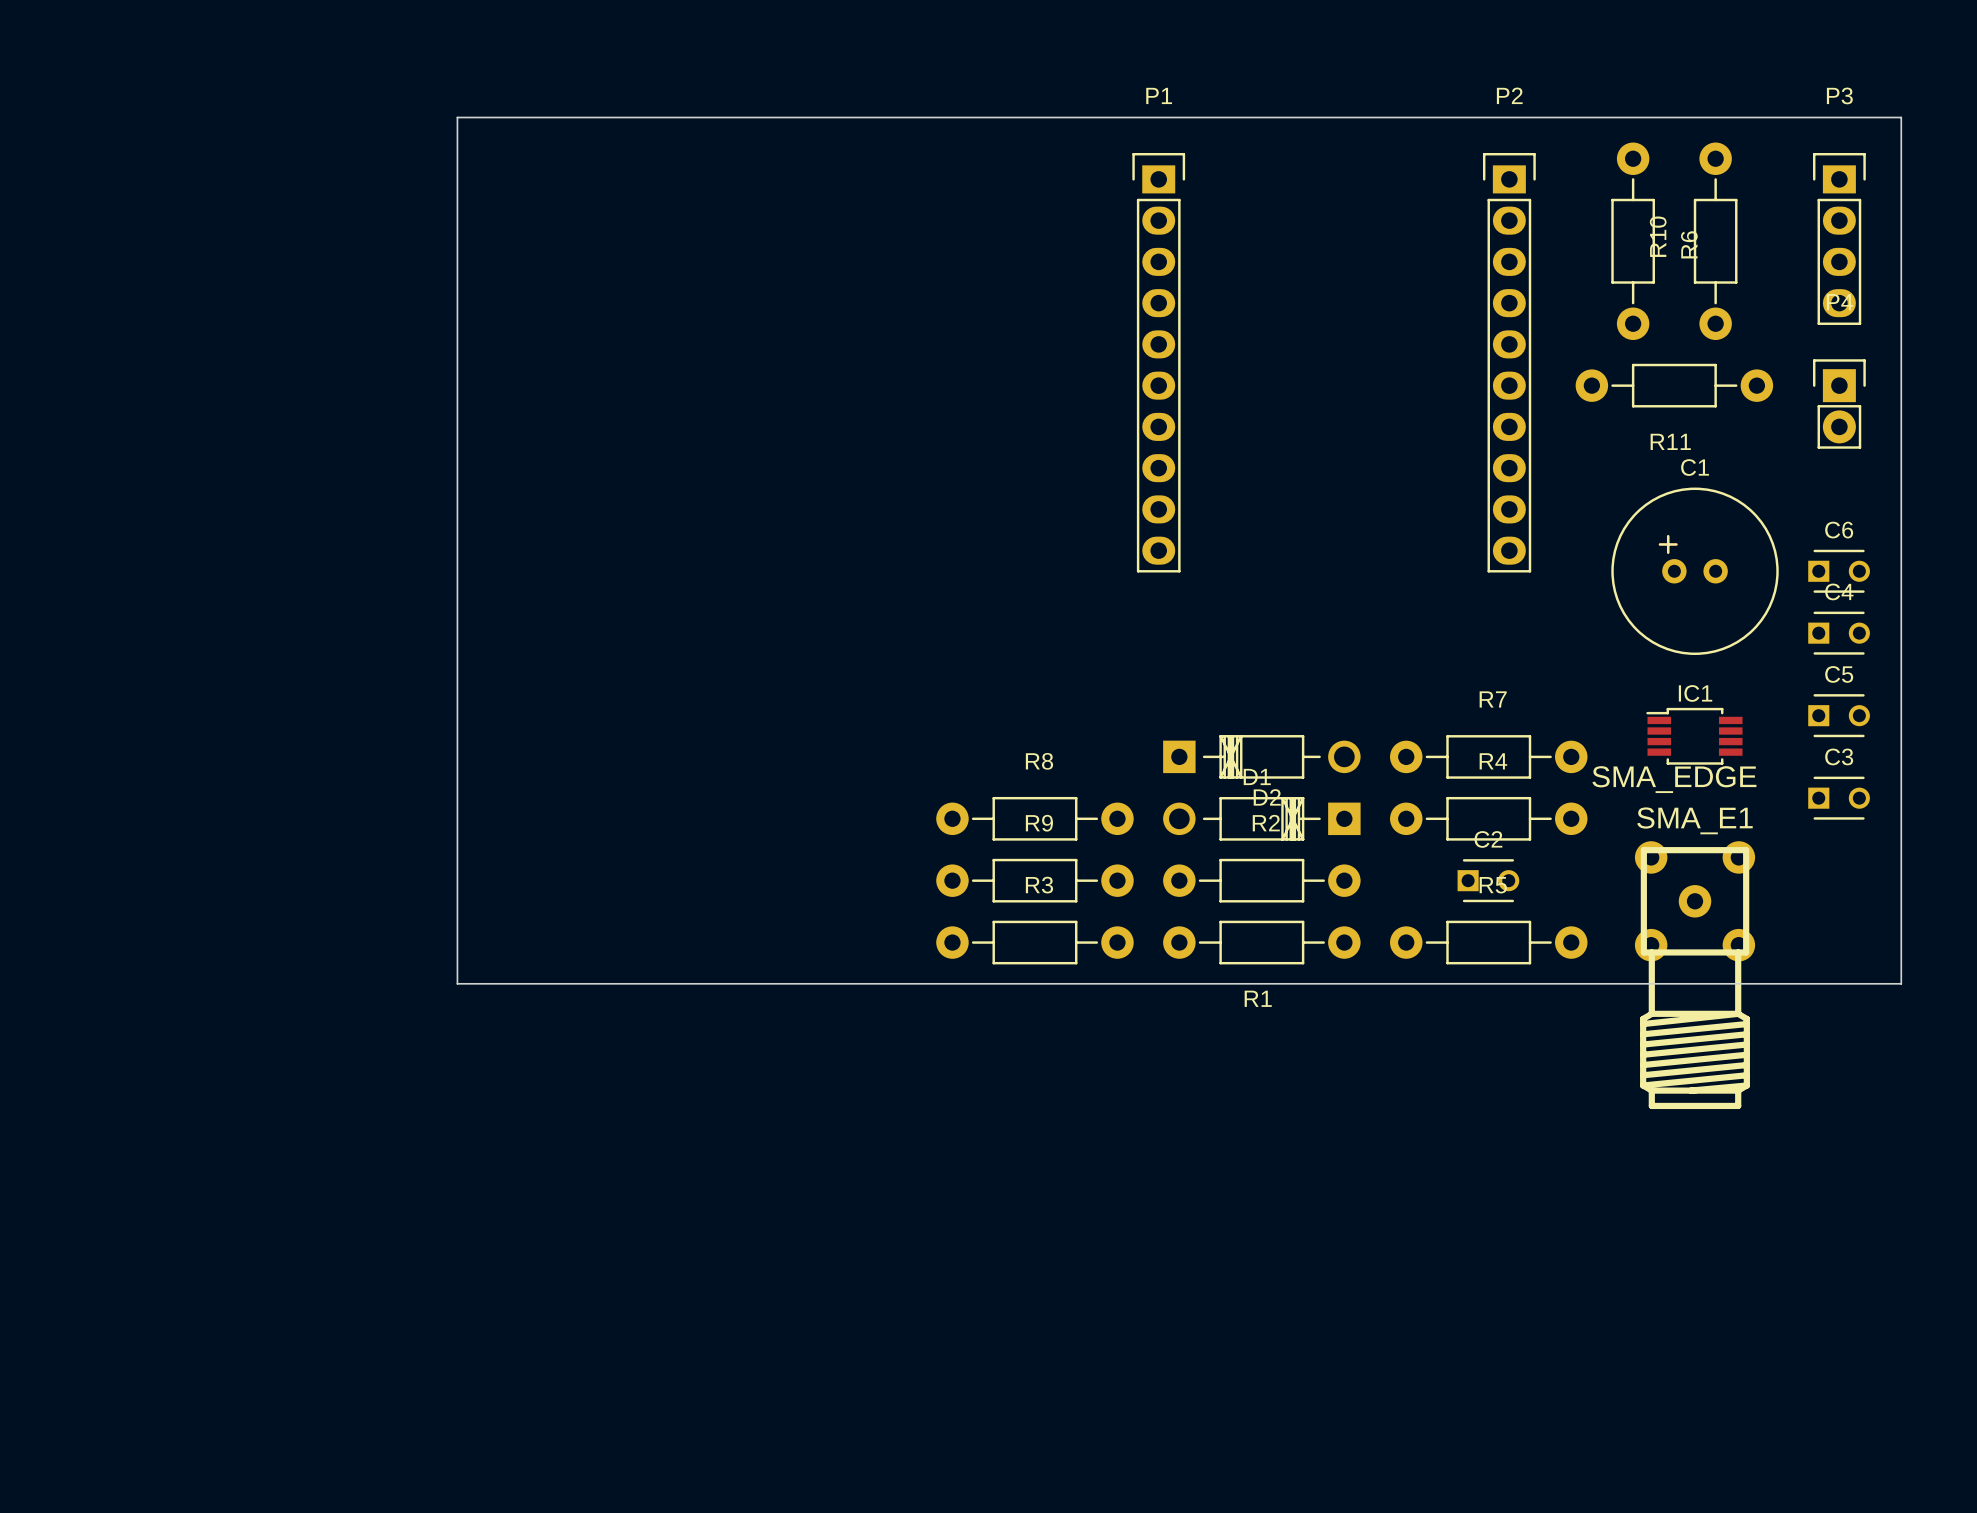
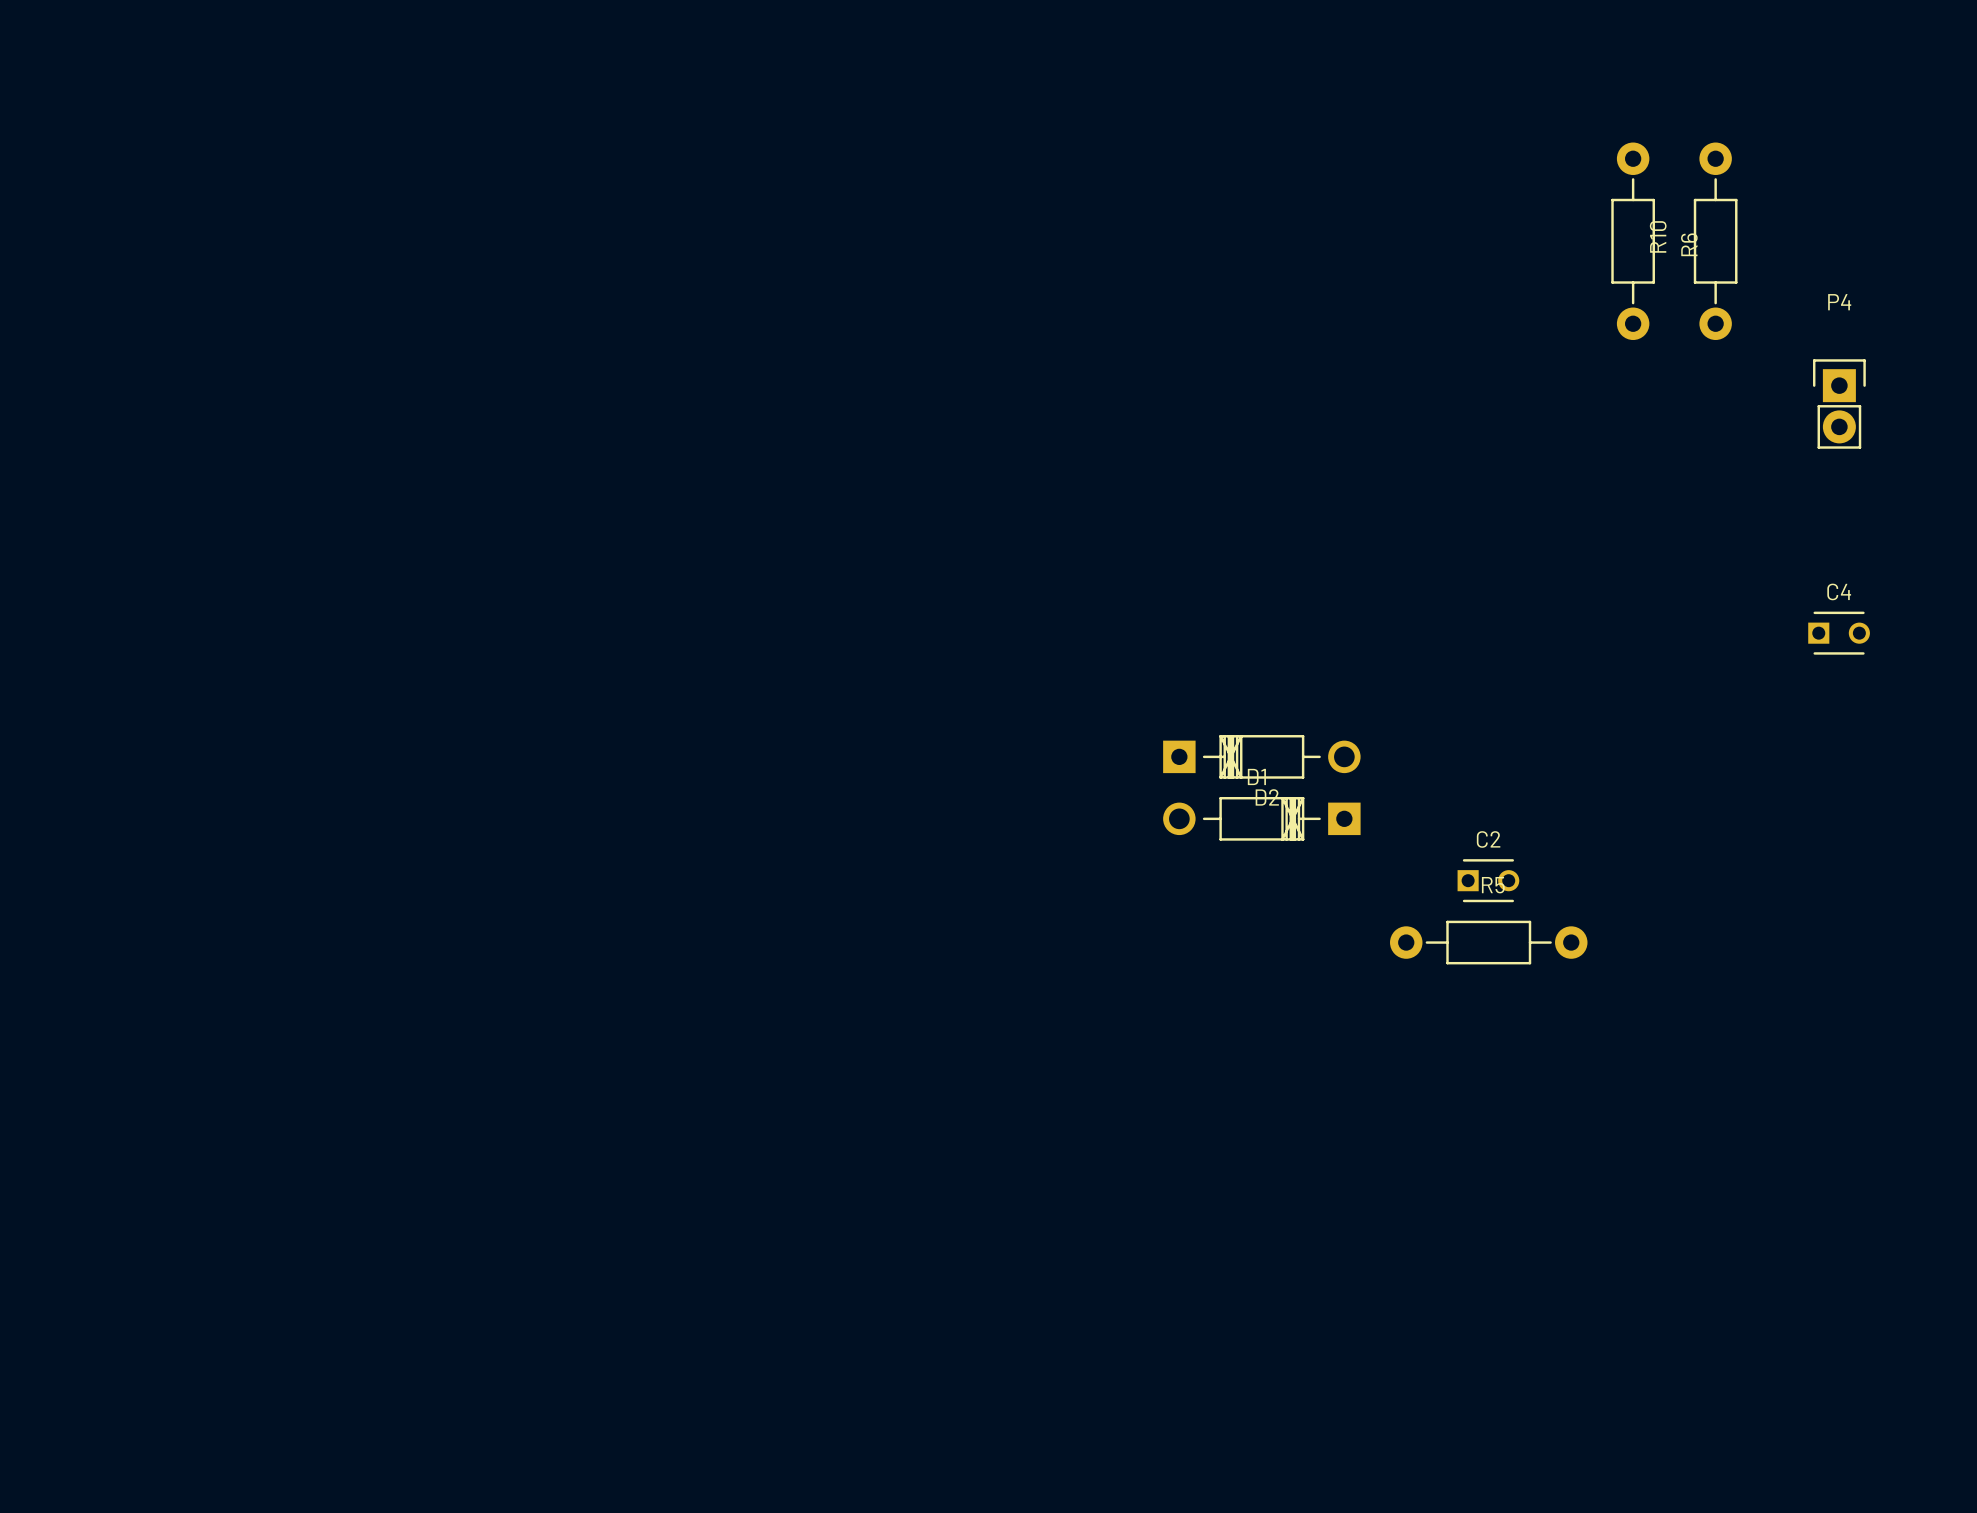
board edge: (457, 117) (457, 983) (1901, 983) (1901, 117) (457, 117) -> none
P3: (1839, 238) -> none
P1: (1158, 362) -> none
P2: (1509, 362) -> none
R11: (1674, 385) -> none
C1: (1695, 571) -> none
C6: (1839, 571) -> none
C5: (1839, 715) -> none
IC1: (1694, 736) -> none
R7: (1488, 756) -> none
C3: (1839, 798) -> none
R8: (1034, 818) -> none
R4: (1488, 818) -> none
R9: (1034, 880) -> none
R2: (1261, 880) -> none
R3: (1034, 942) -> none
R1: (1261, 942) -> none
SMA_E1: SMA_EDGE (1695, 975) -> none

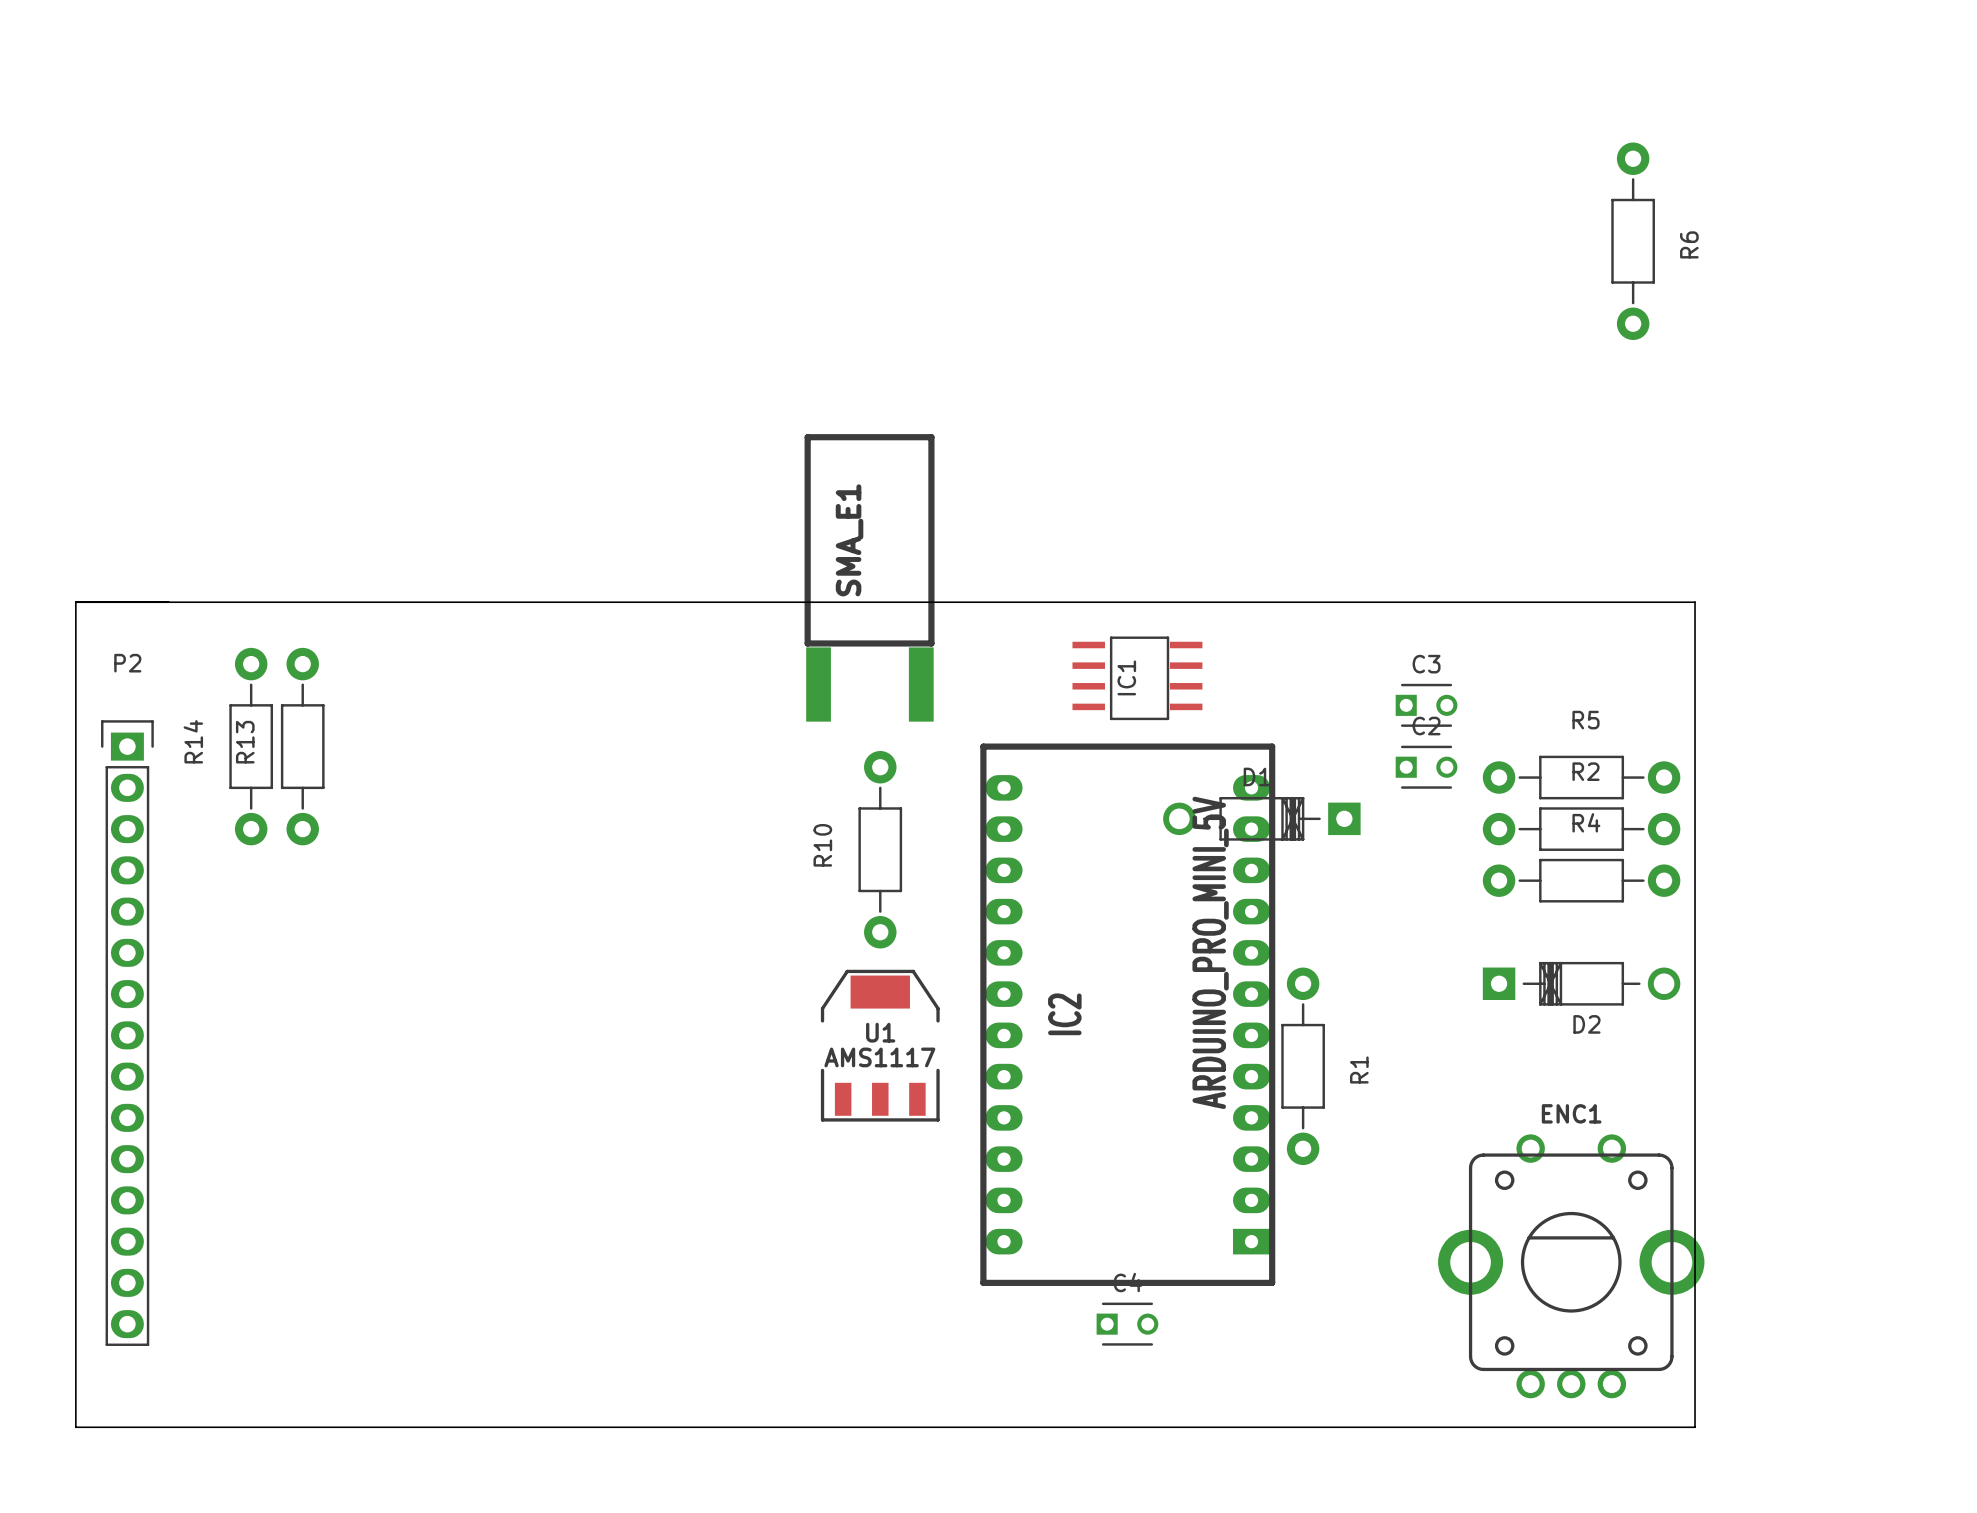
R10 position: (1715, 241) -> (880, 849)
P4: (1839, 403) -> none
SMA_E1: none -> (869, 577)
board edge: none -> (75, 602) (1695, 602) (1695, 1427) (75, 1427) (75, 602)
C4 position: (1839, 633) -> (1127, 1324)
IC1: none -> (1137, 678)
C3: none -> (1426, 705)
R14: none -> (251, 746)
R13: none -> (302, 746)
D2 position: (1261, 756) -> (1581, 983)
R2: none -> (1581, 829)
C2 position: (1488, 880) -> (1426, 767)
R4: none -> (1581, 880)
R5 position: (1488, 942) -> (1581, 777)
IC2: none -> ARDUINO_PRO_MINI_5V (1127, 1014)
P2: none -> (127, 1033)
U1: none -> AMS1117 (880, 1045)
R1: none -> (1303, 1066)
ENC1: none -> (1571, 1266)

